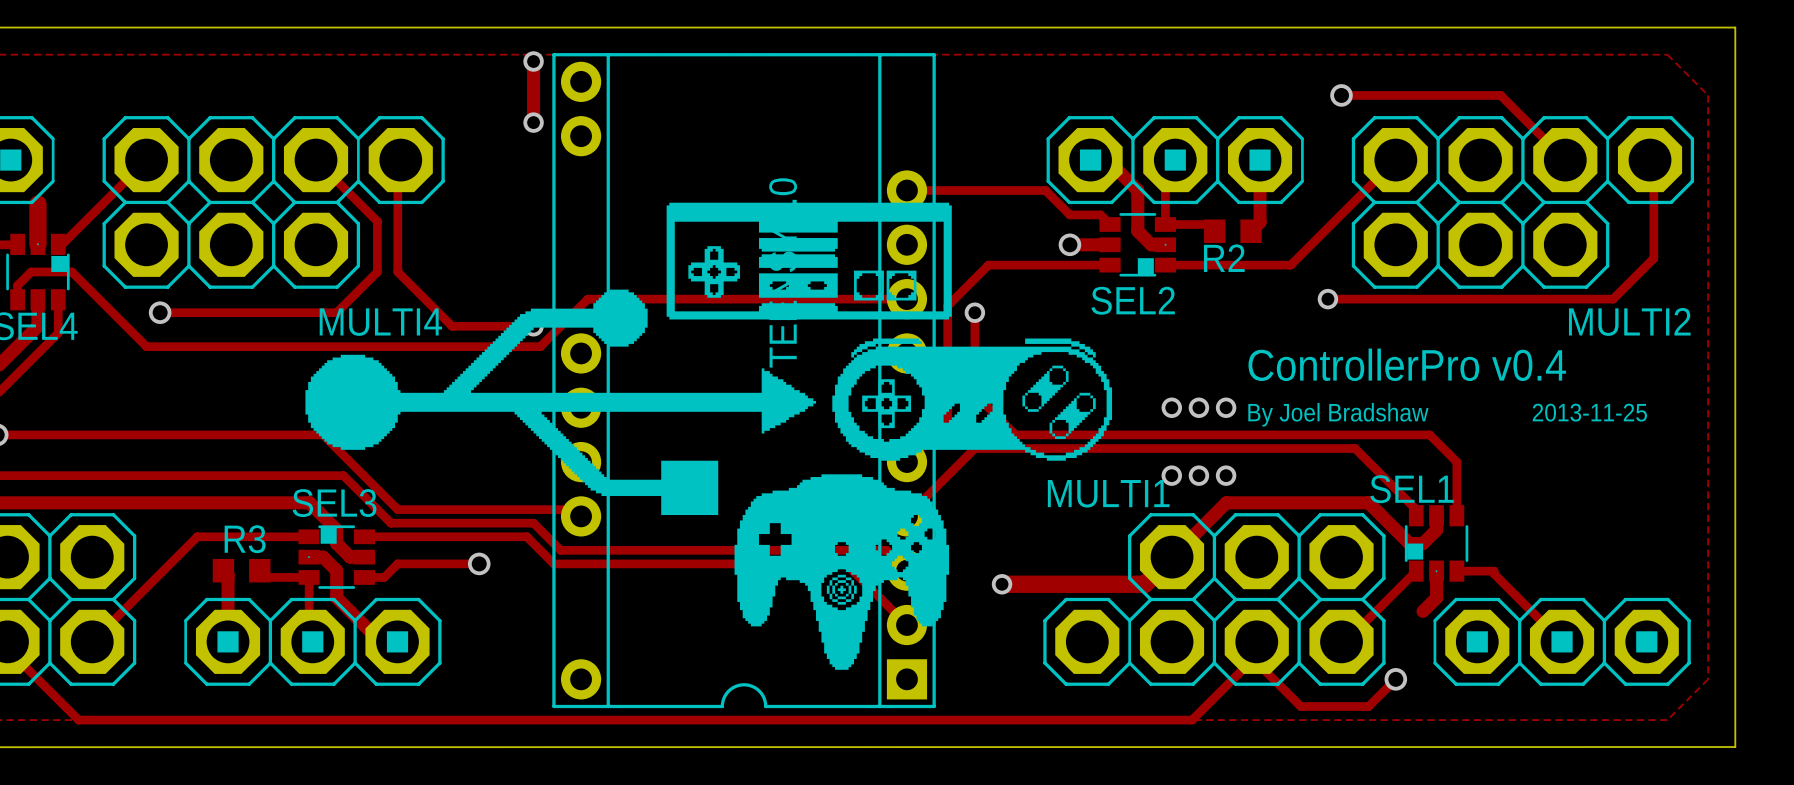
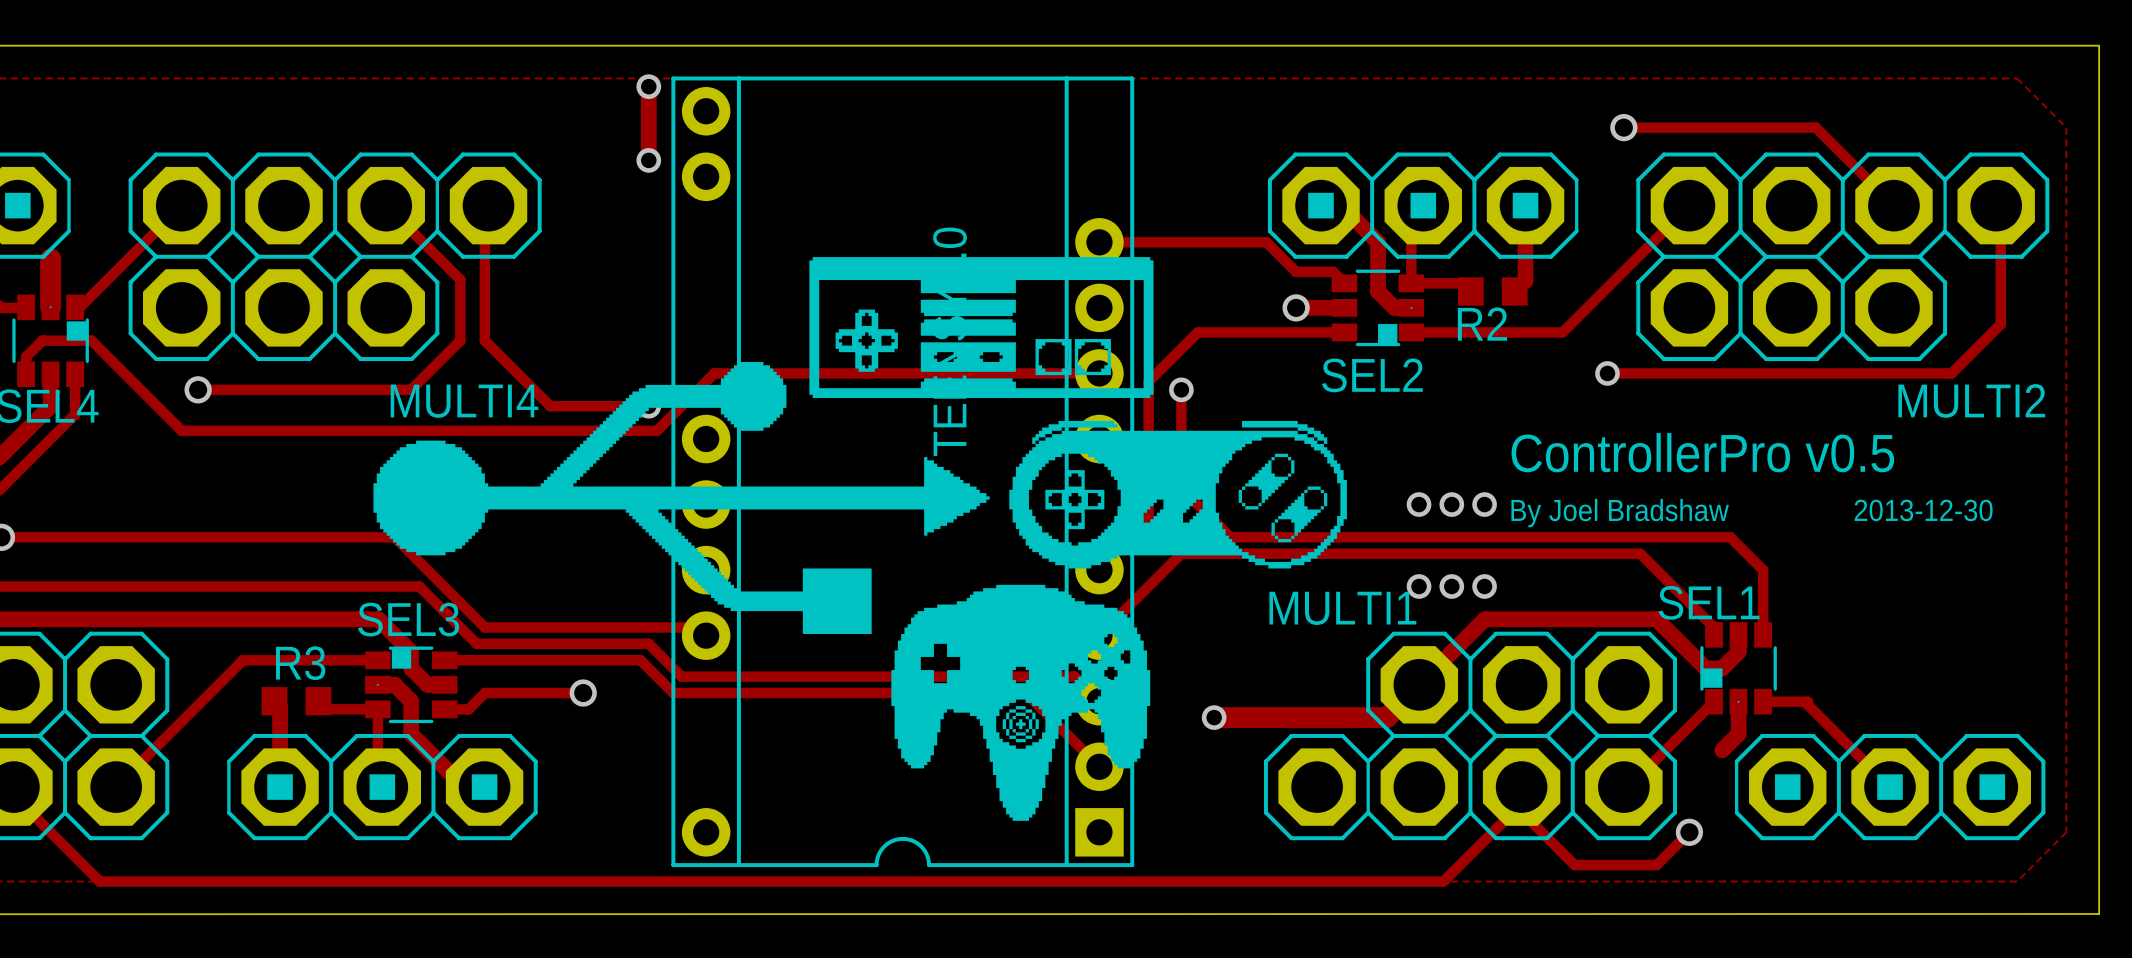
text: ControllerPro v0.4 (1407, 364) -> ControllerPro v0.5 (1702, 452)
text: 2013-11-25 (1589, 412) -> 2013-12-30 (1923, 510)

